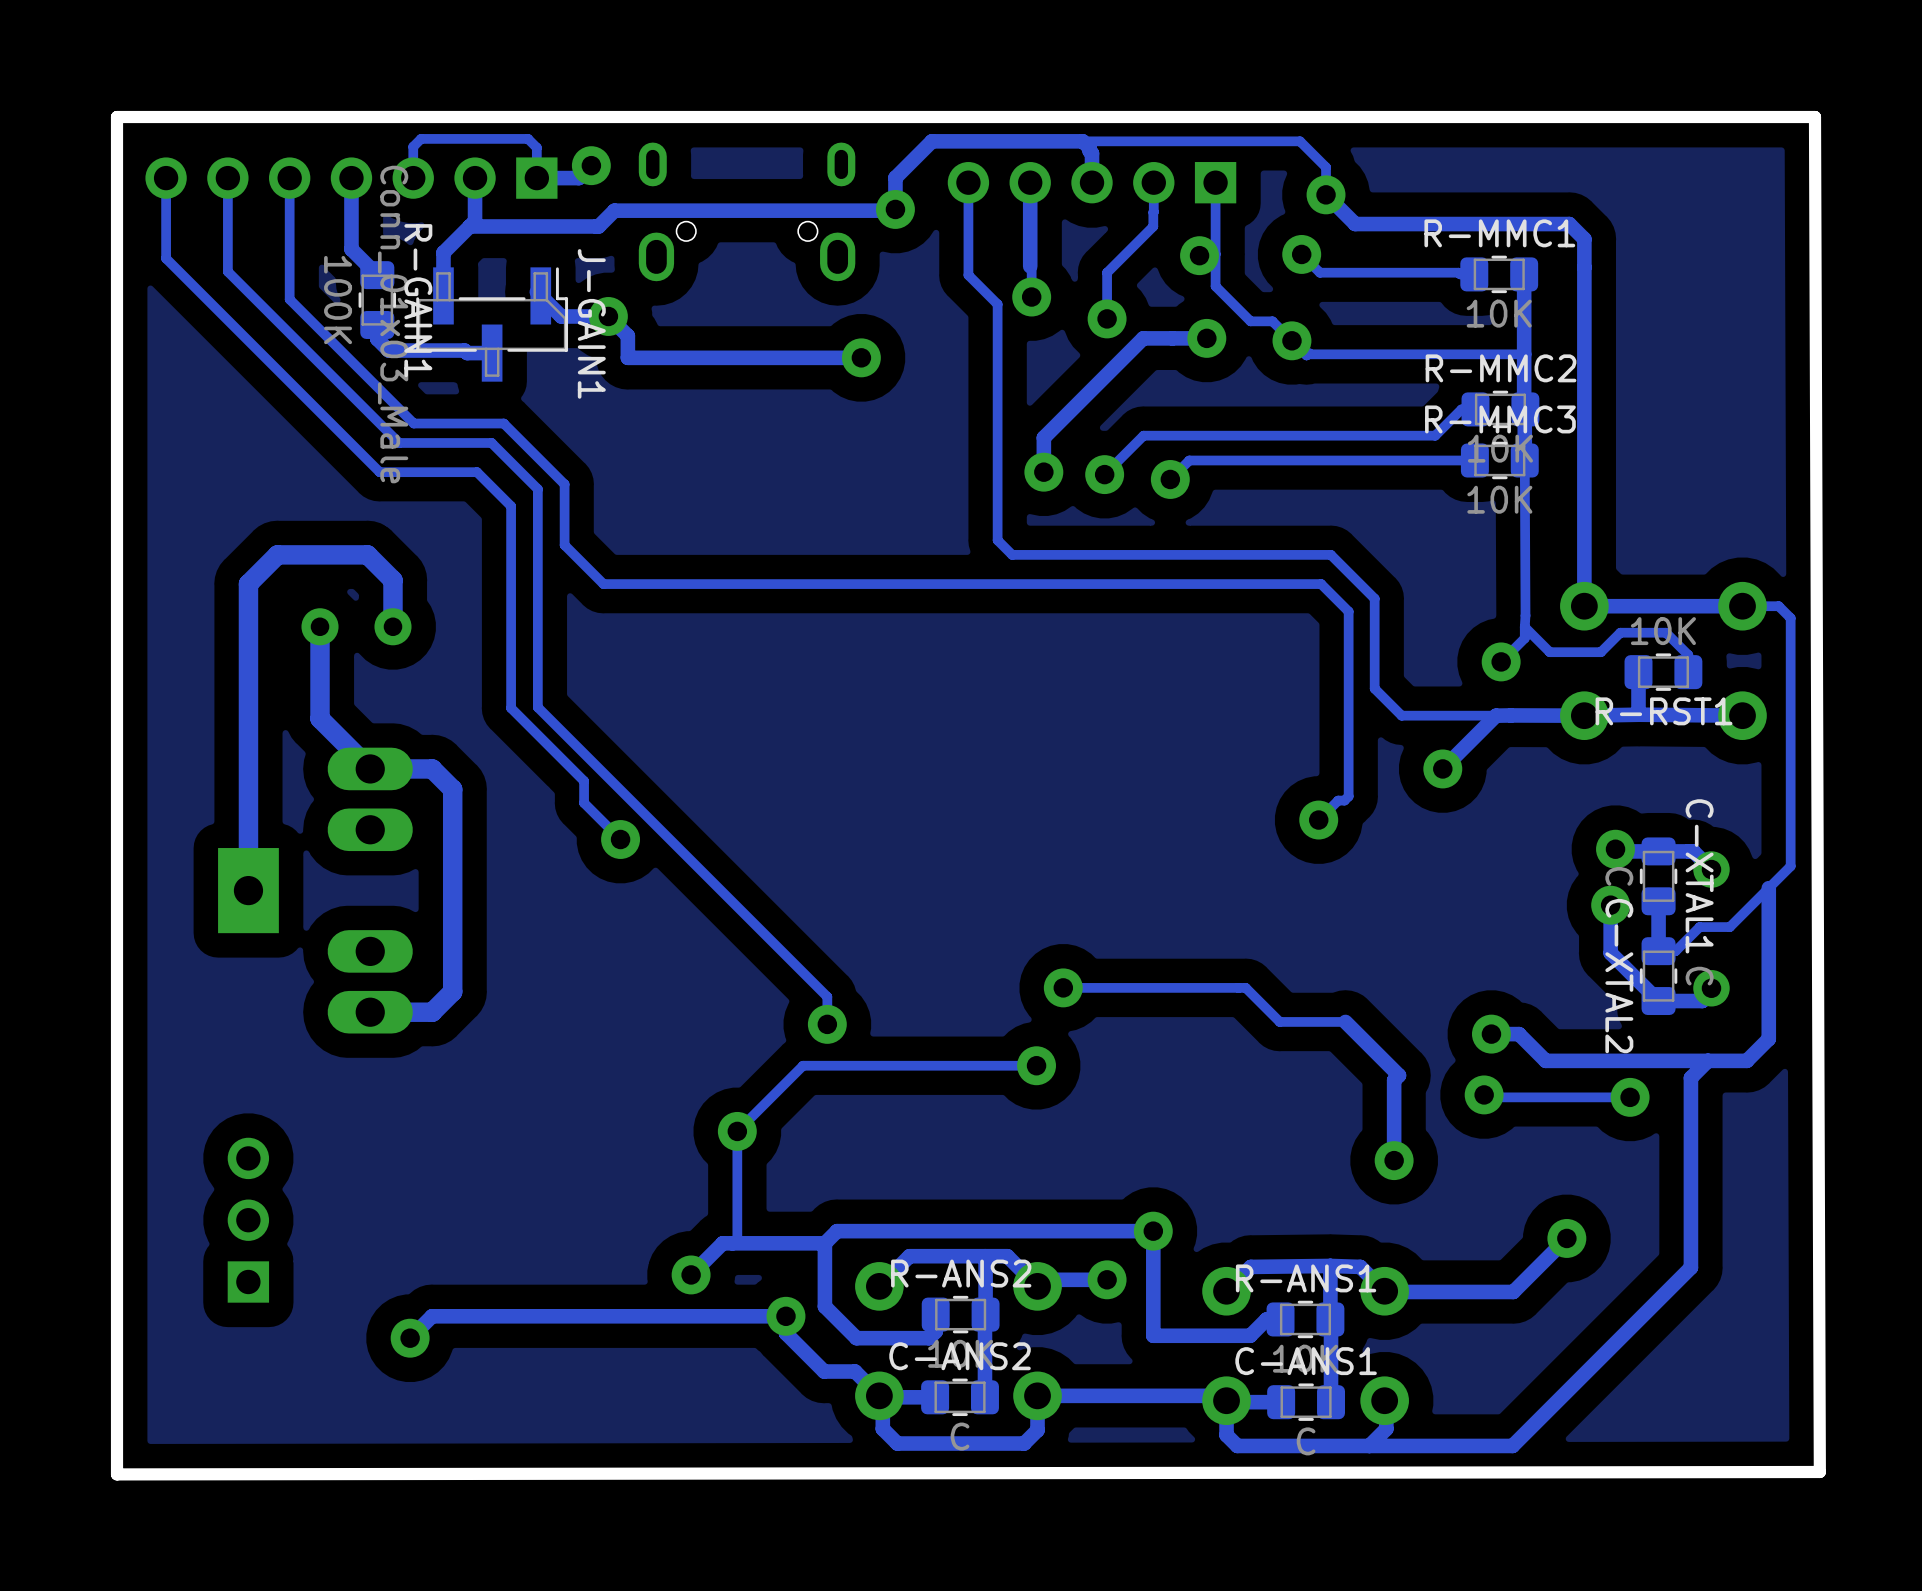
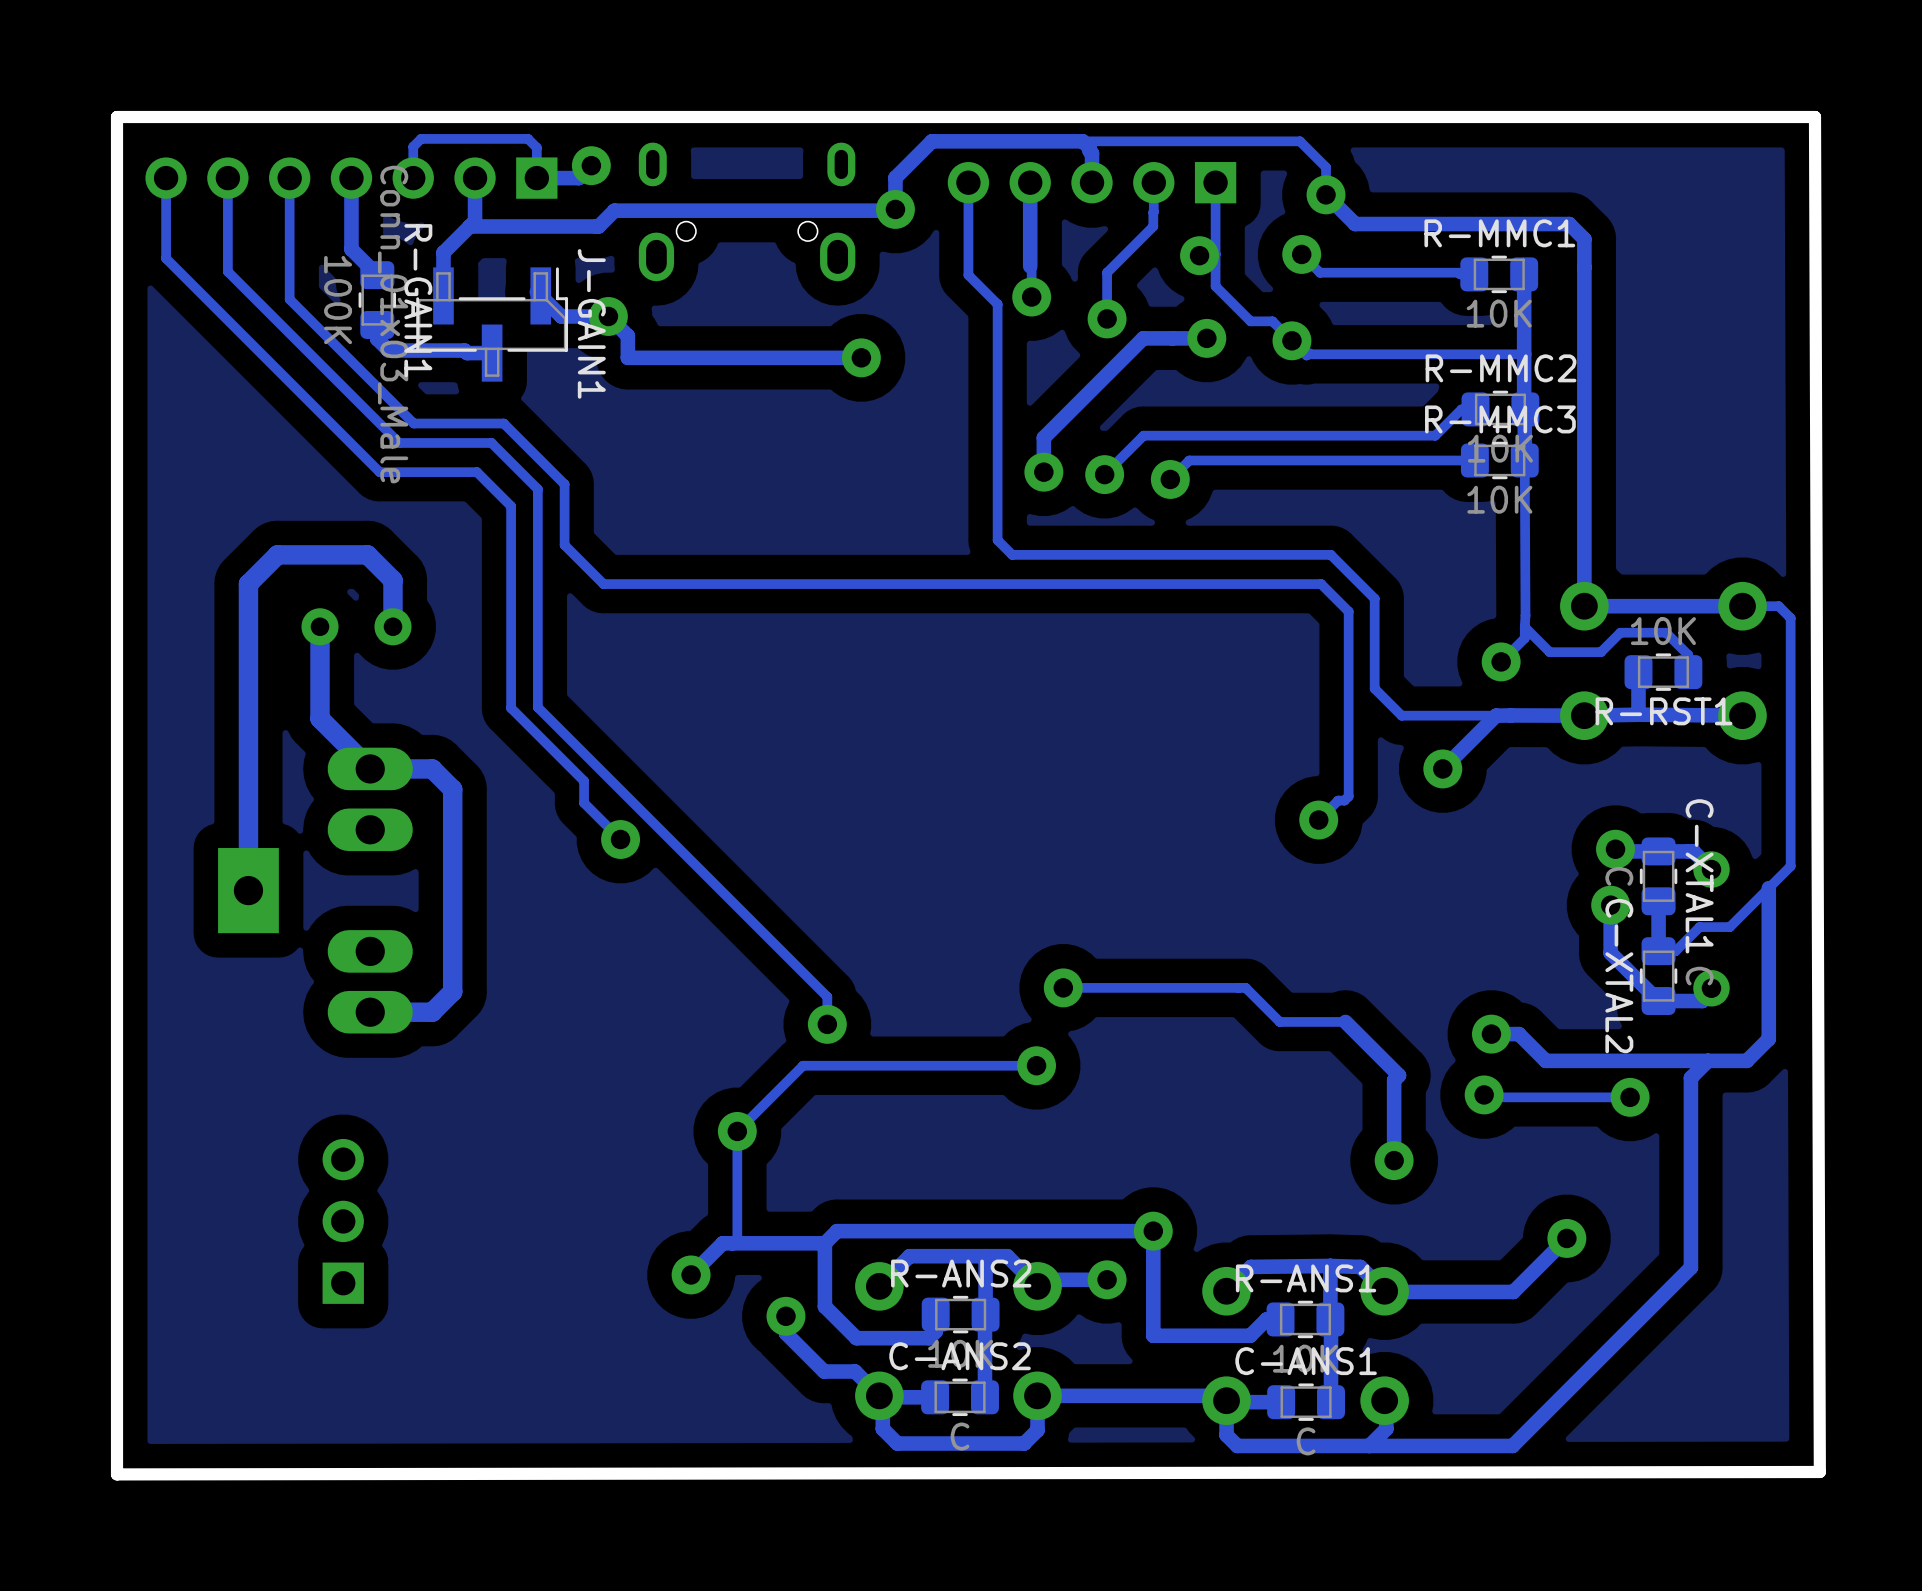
part position: (248, 1220) -> (343, 1221)
track: (785, 1316) (432, 1316) (410, 1338) -> none
via: (410, 1338) -> none

